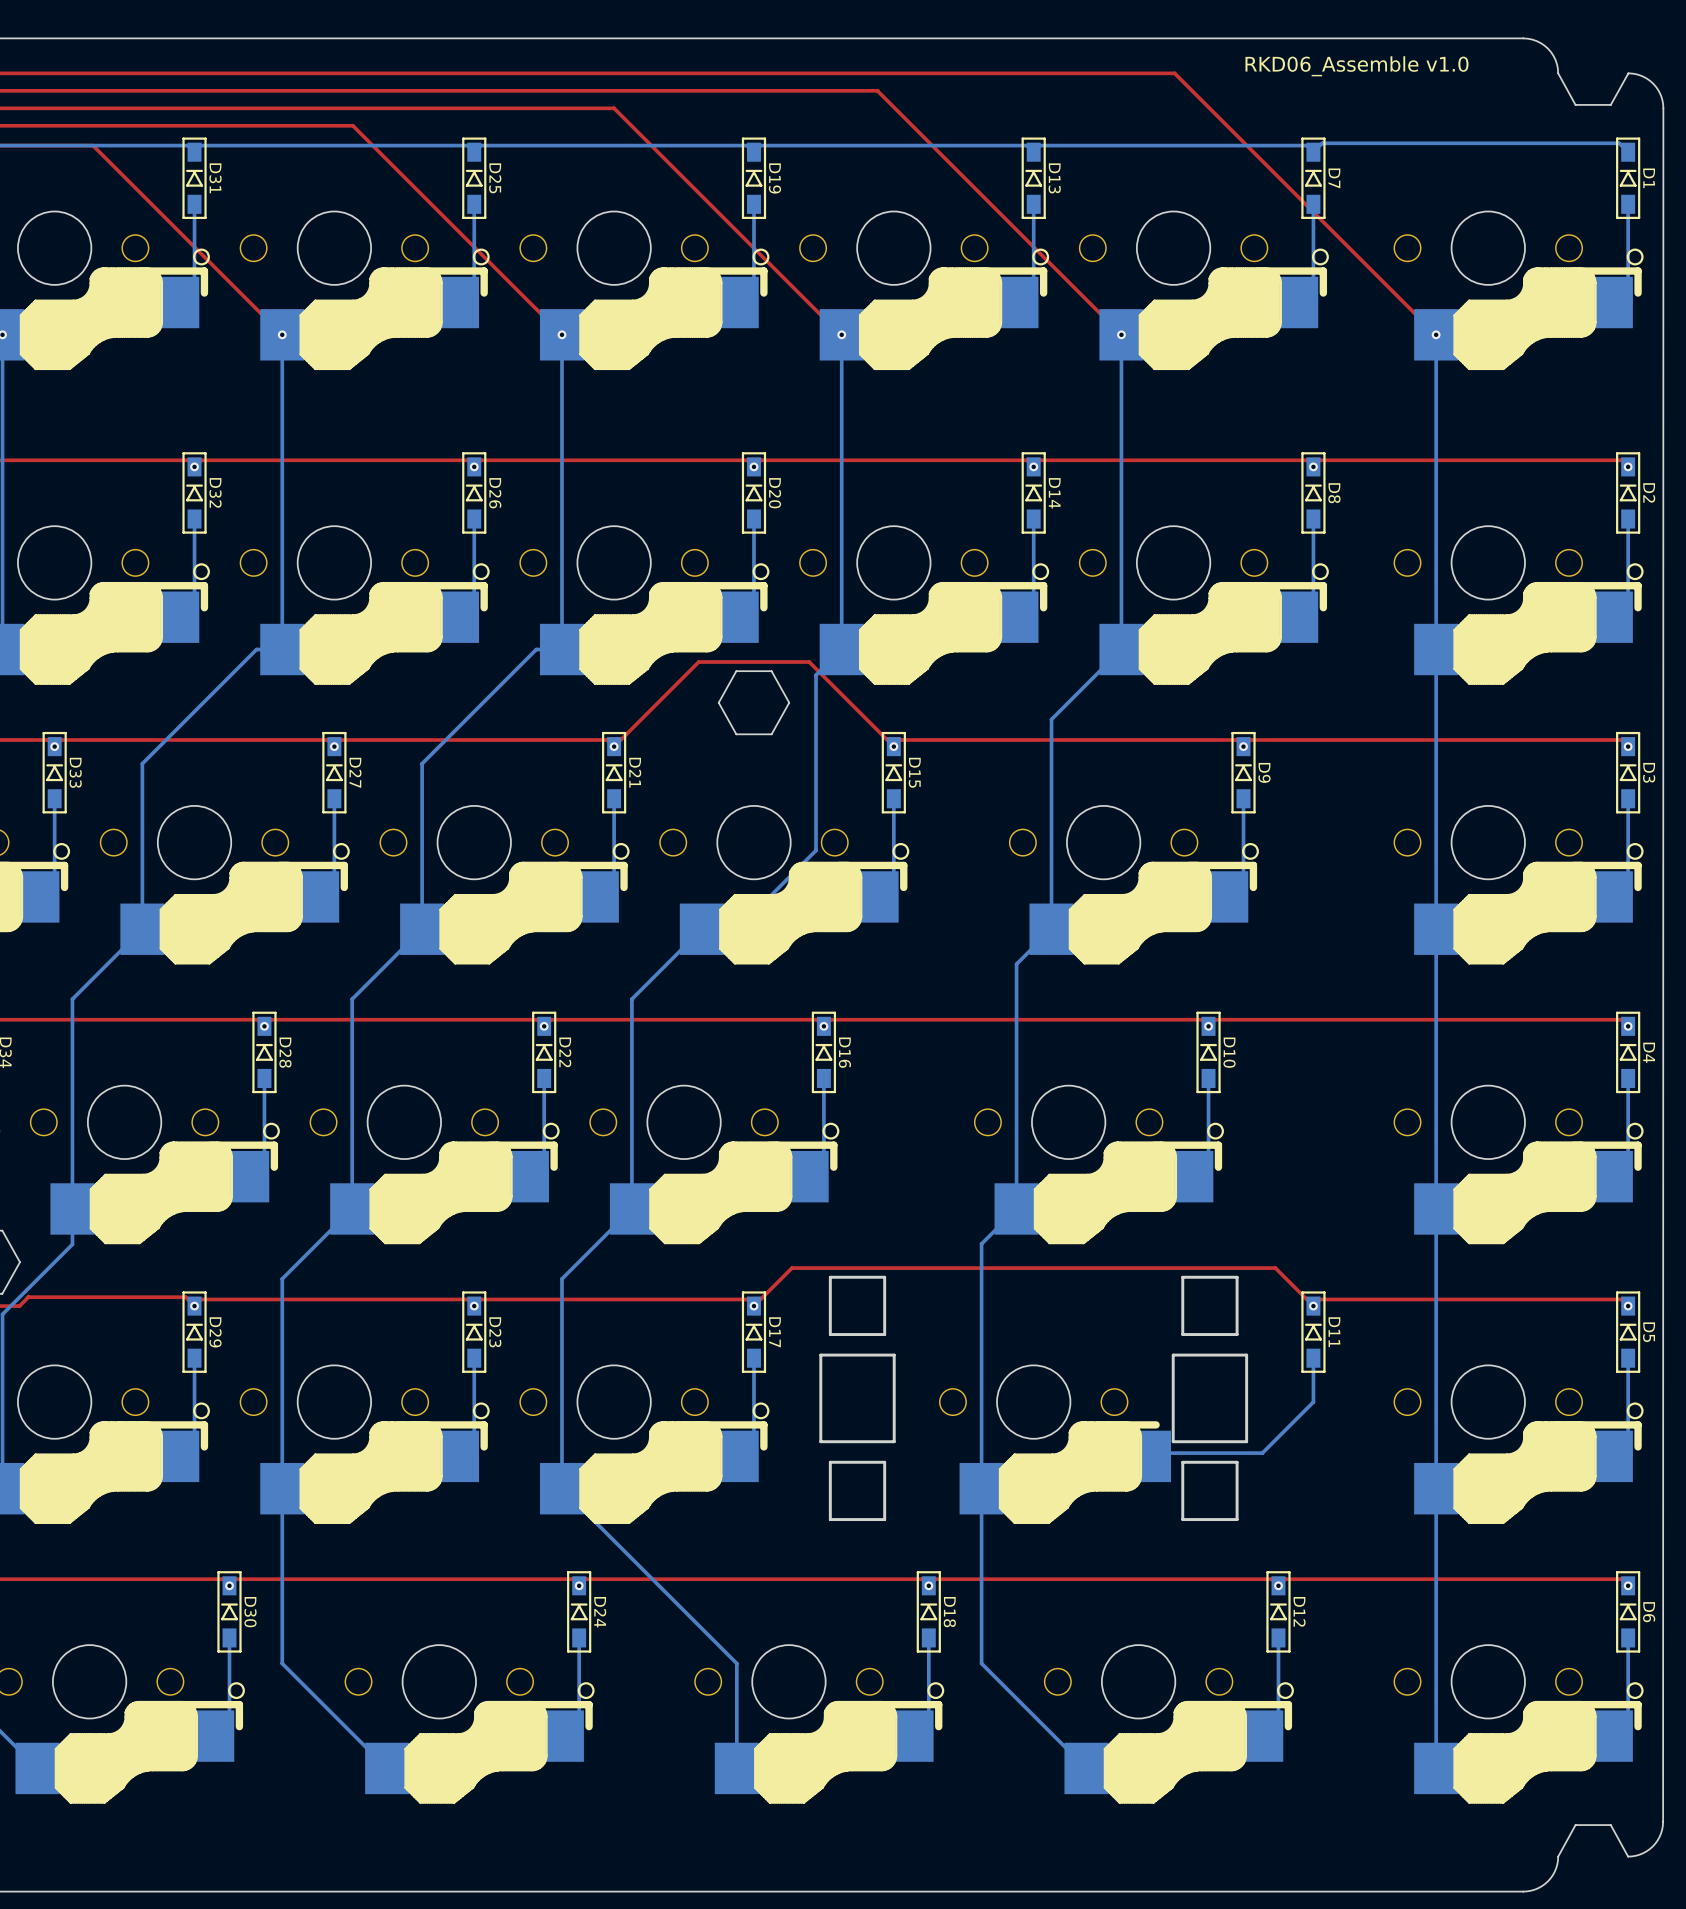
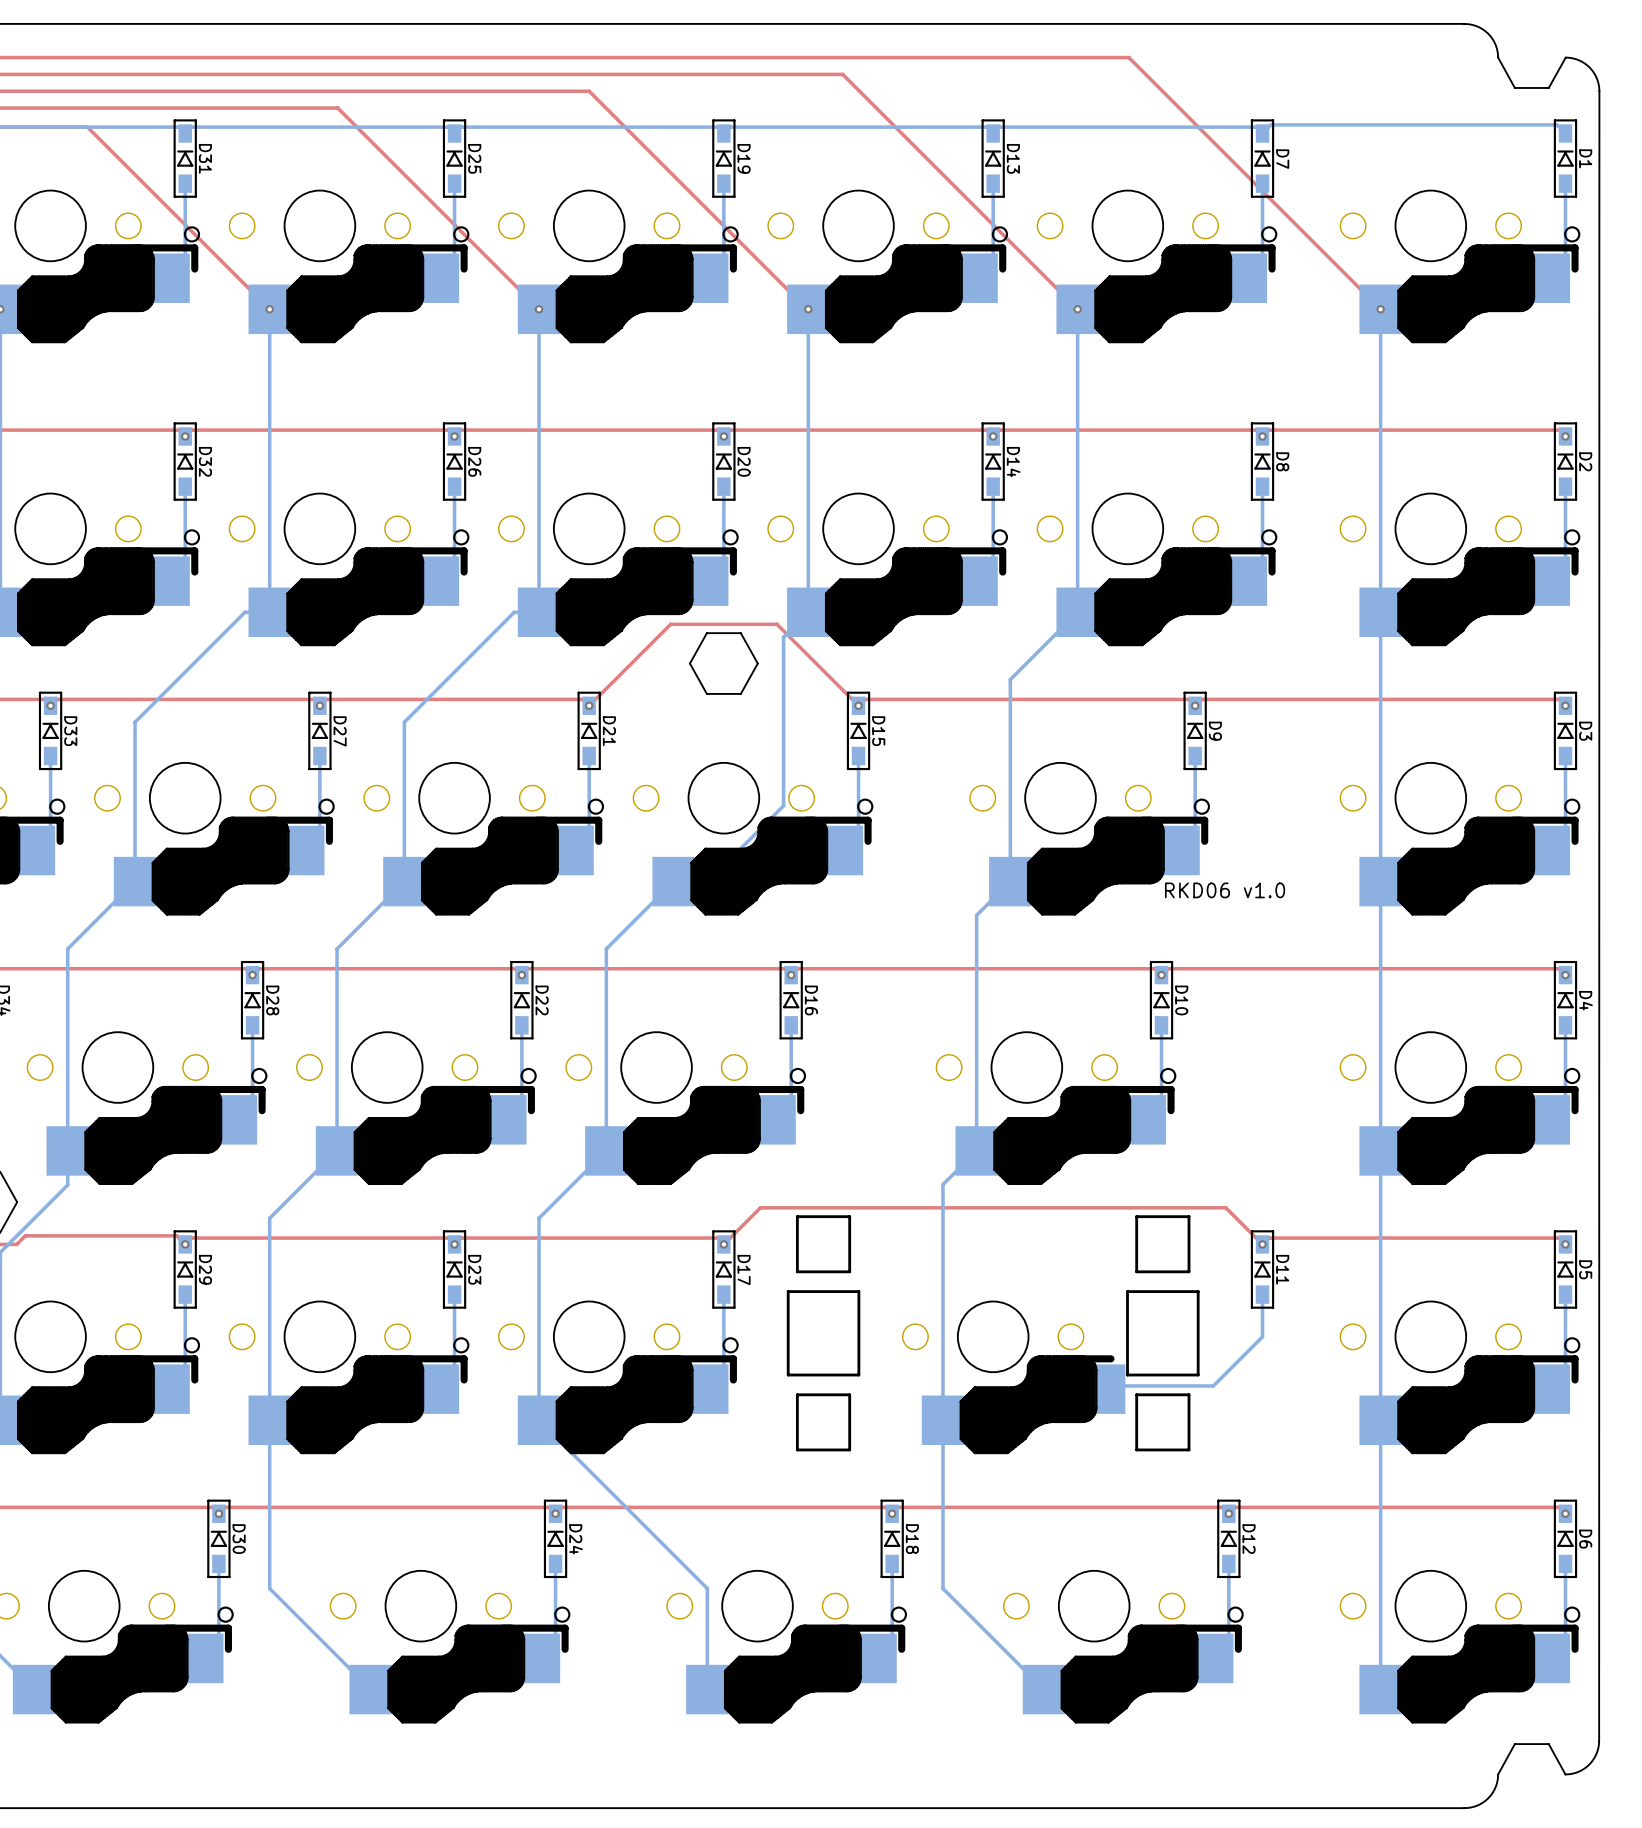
text: RKD06_Assemble v1.0 (1356, 66) -> none
text: none -> RKD06 v1.0 (1225, 890)

